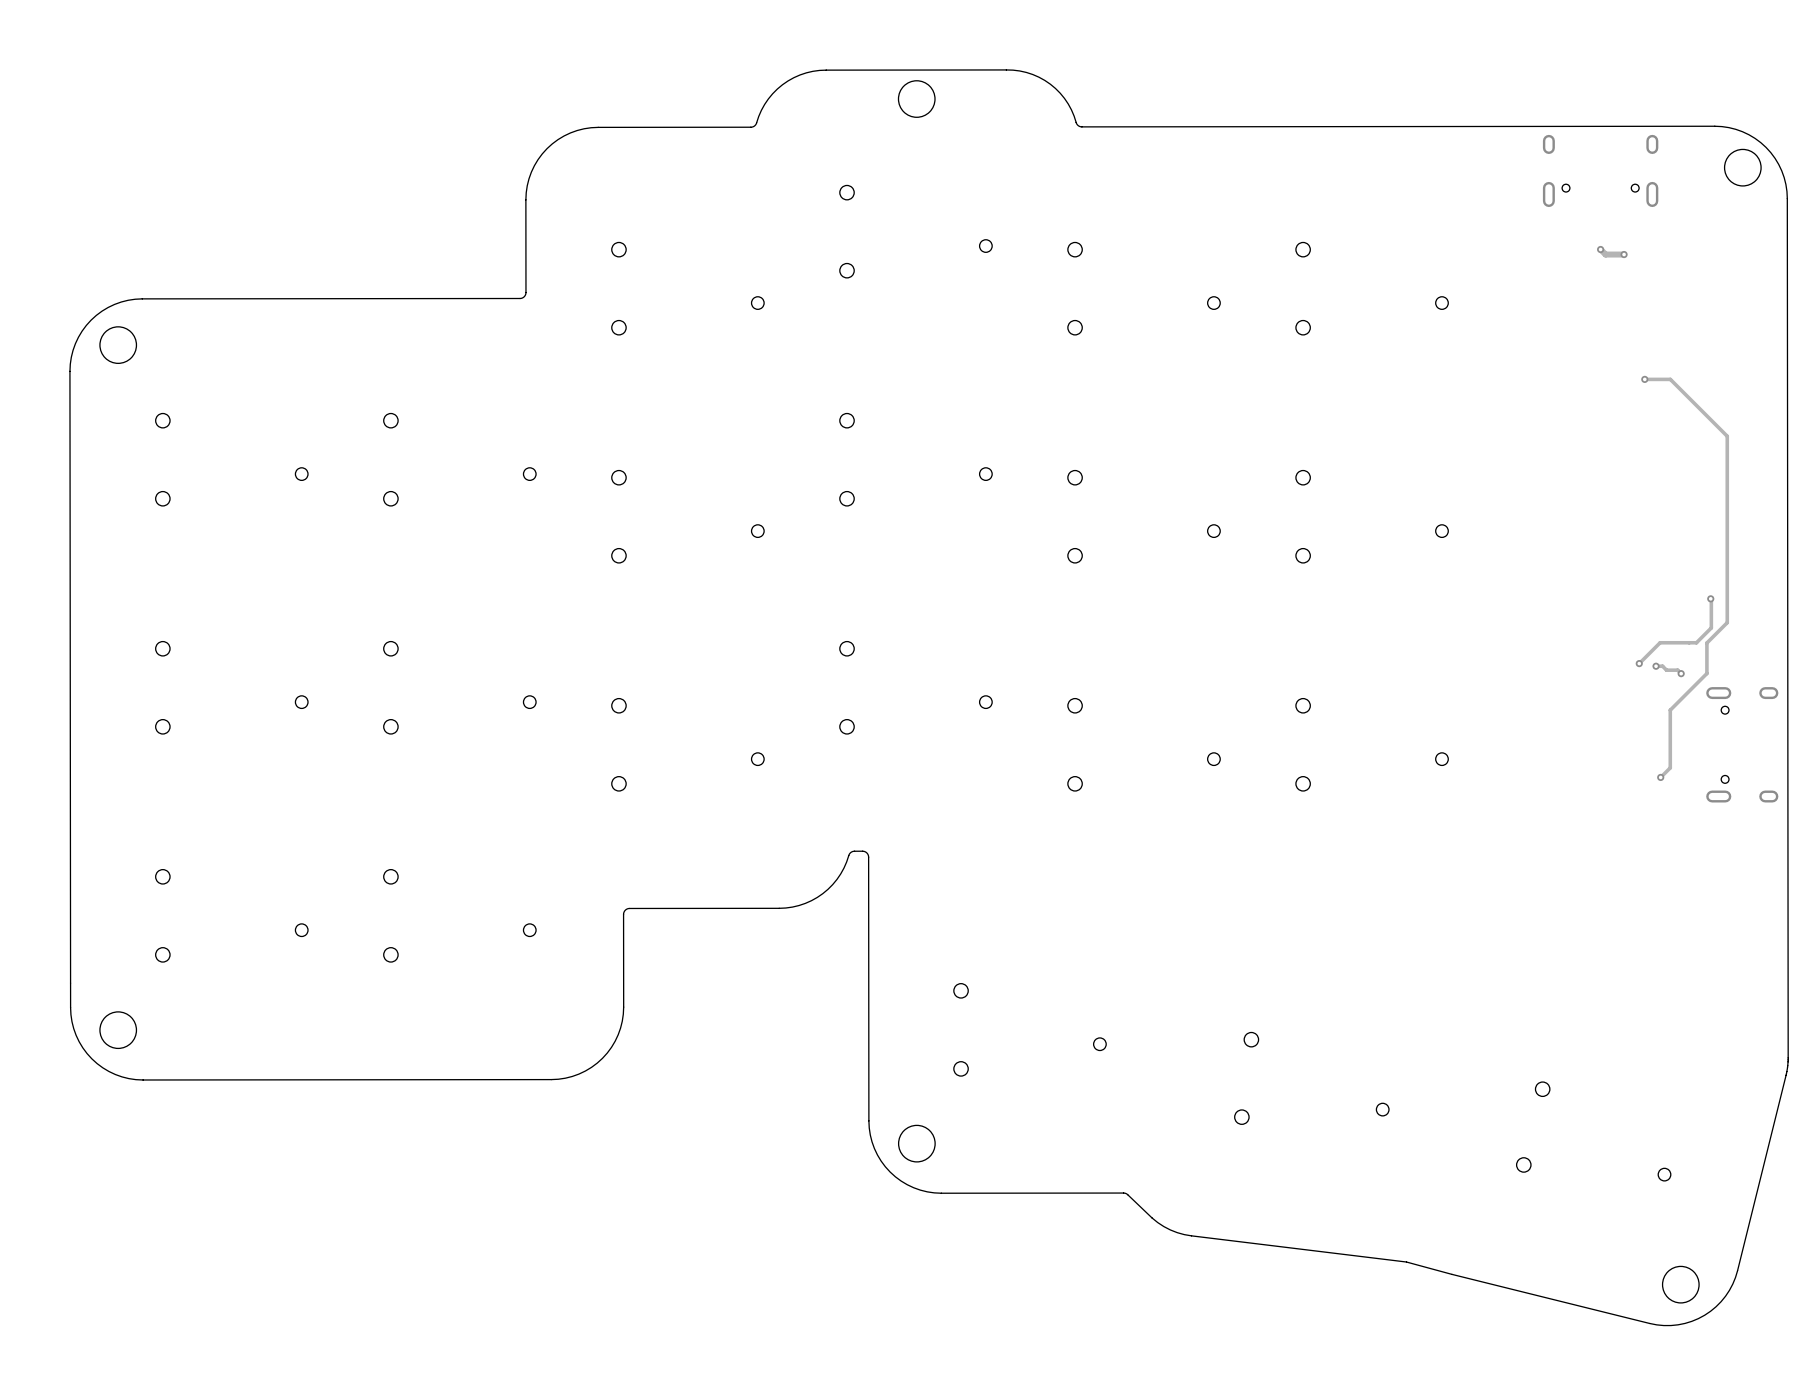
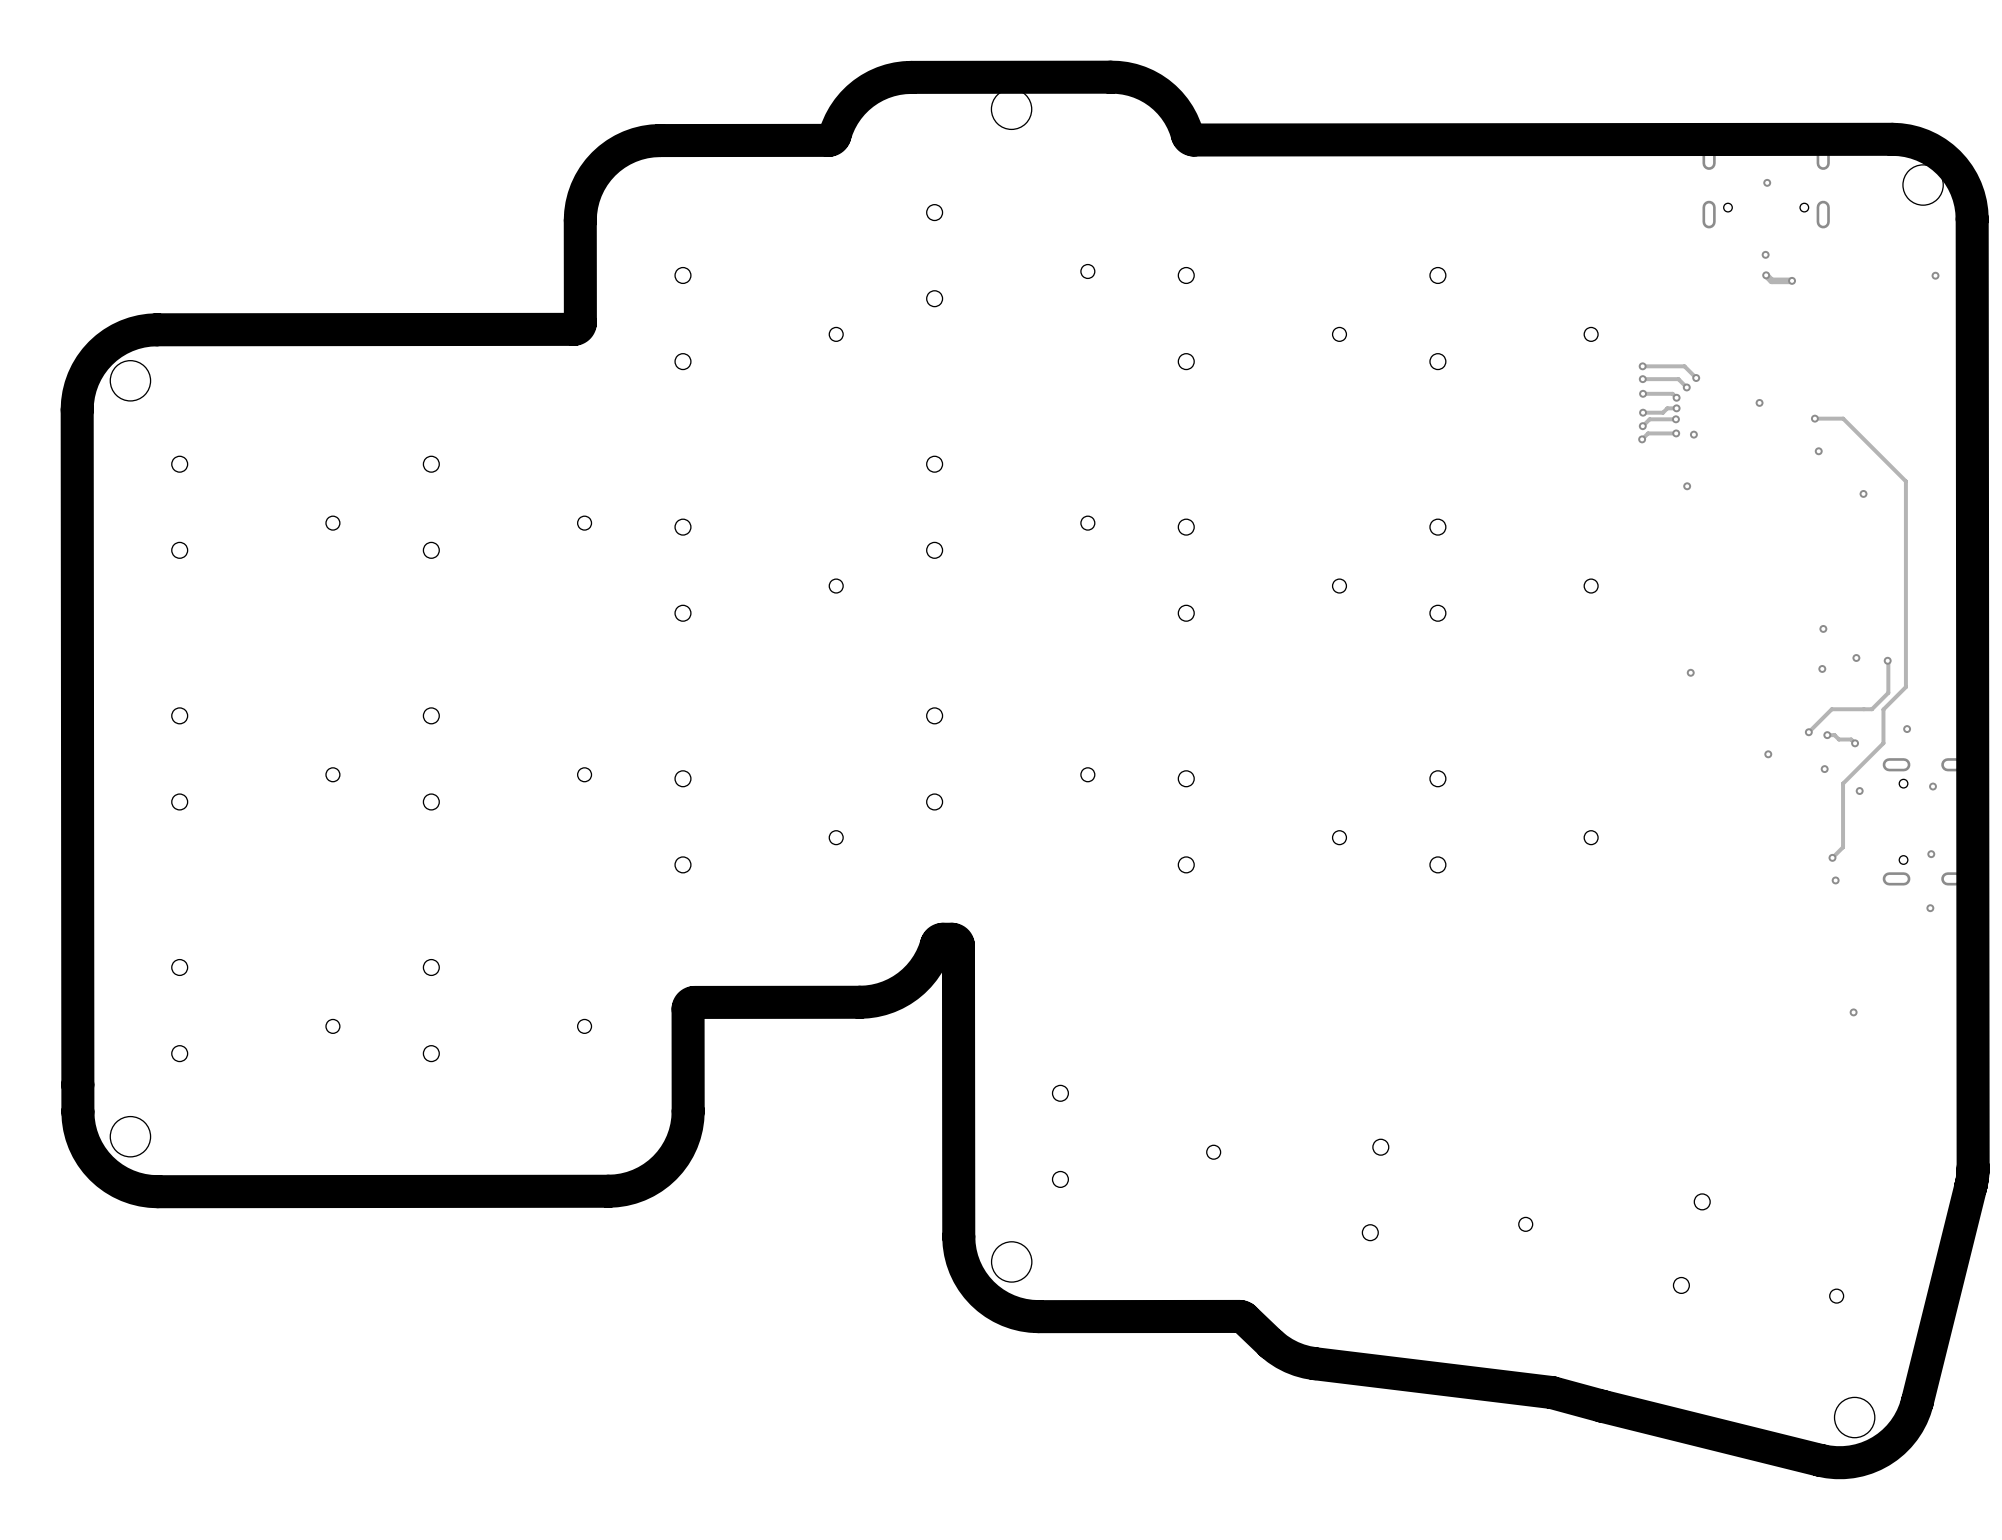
line: none -> (1110, 77) (896, 78) (876, 85) (857, 98) (843, 115) (834, 137) (830, 140) (660, 140) (644, 142) (629, 146) (609, 158) (598, 169) (589, 182) (583, 197) (580, 220) (580, 323) (575, 329) (149, 330) (133, 333) (119, 339) (100, 353) (90, 365) (83, 379) (78, 394) (77, 409) (77, 1111) (79, 1127) (87, 1149) (101, 1168) (113, 1178) (127, 1185) (150, 1191) (623, 1189) (638, 1185) (659, 1173) (670, 1161) (682, 1141) (687, 1119) (688, 1009) (690, 1003) (859, 1002) (881, 999) (901, 990) (918, 976) (927, 964) (938, 940) (952, 939) (956, 941) (958, 945) (959, 1244) (964, 1267) (972, 1281) (982, 1293) (1001, 1307) (1015, 1313) (1038, 1316) (1240, 1316) (1277, 1349) (1291, 1357) (1306, 1362) (1551, 1392) (1828, 1461) (1851, 1461) (1866, 1458) (1880, 1451) (1899, 1436) (1908, 1423) (1915, 1409) (1973, 1171) (1972, 219) (1968, 195) (1962, 181) (1948, 162) (1936, 152) (1922, 145) (1900, 139) (1193, 139) (1187, 136) (1174, 108) (1158, 92) (1139, 82) (1110, 77)
via: none -> (1767, 182)
via: none -> (1765, 254)
via: none -> (1935, 275)
track: none -> (1642, 366) (1684, 366) (1696, 378)
via: none -> (1642, 366)
via: none -> (1696, 378)
track: none -> (1642, 379) (1678, 379) (1686, 387)
via: none -> (1642, 379)
via: none -> (1686, 387)
track: none -> (1643, 393) (1672, 393) (1676, 397)
via: none -> (1643, 393)
via: none -> (1676, 397)
via: none -> (1759, 402)
track: none -> (1676, 408) (1667, 408) (1662, 412) (1643, 412)
via: none -> (1676, 408)
via: none -> (1643, 412)
track: none -> (1675, 419) (1649, 419) (1642, 426)
via: none -> (1675, 419)
via: none -> (1642, 426)
track: none -> (1676, 433) (1648, 433) (1642, 439)
via: none -> (1676, 433)
via: none -> (1693, 434)
via: none -> (1642, 439)
via: none -> (1818, 451)
via: none -> (1687, 486)
via: none -> (1863, 493)
via: none -> (1823, 628)
via: none -> (1856, 658)
via: none -> (1822, 668)
via: none -> (1690, 672)
via: none -> (1907, 729)
via: none -> (1768, 754)
via: none -> (1824, 769)
via: none -> (1933, 786)
via: none -> (1859, 791)
via: none -> (1931, 854)
via: none -> (1835, 880)
via: none -> (1930, 908)
via: none -> (1853, 1012)

